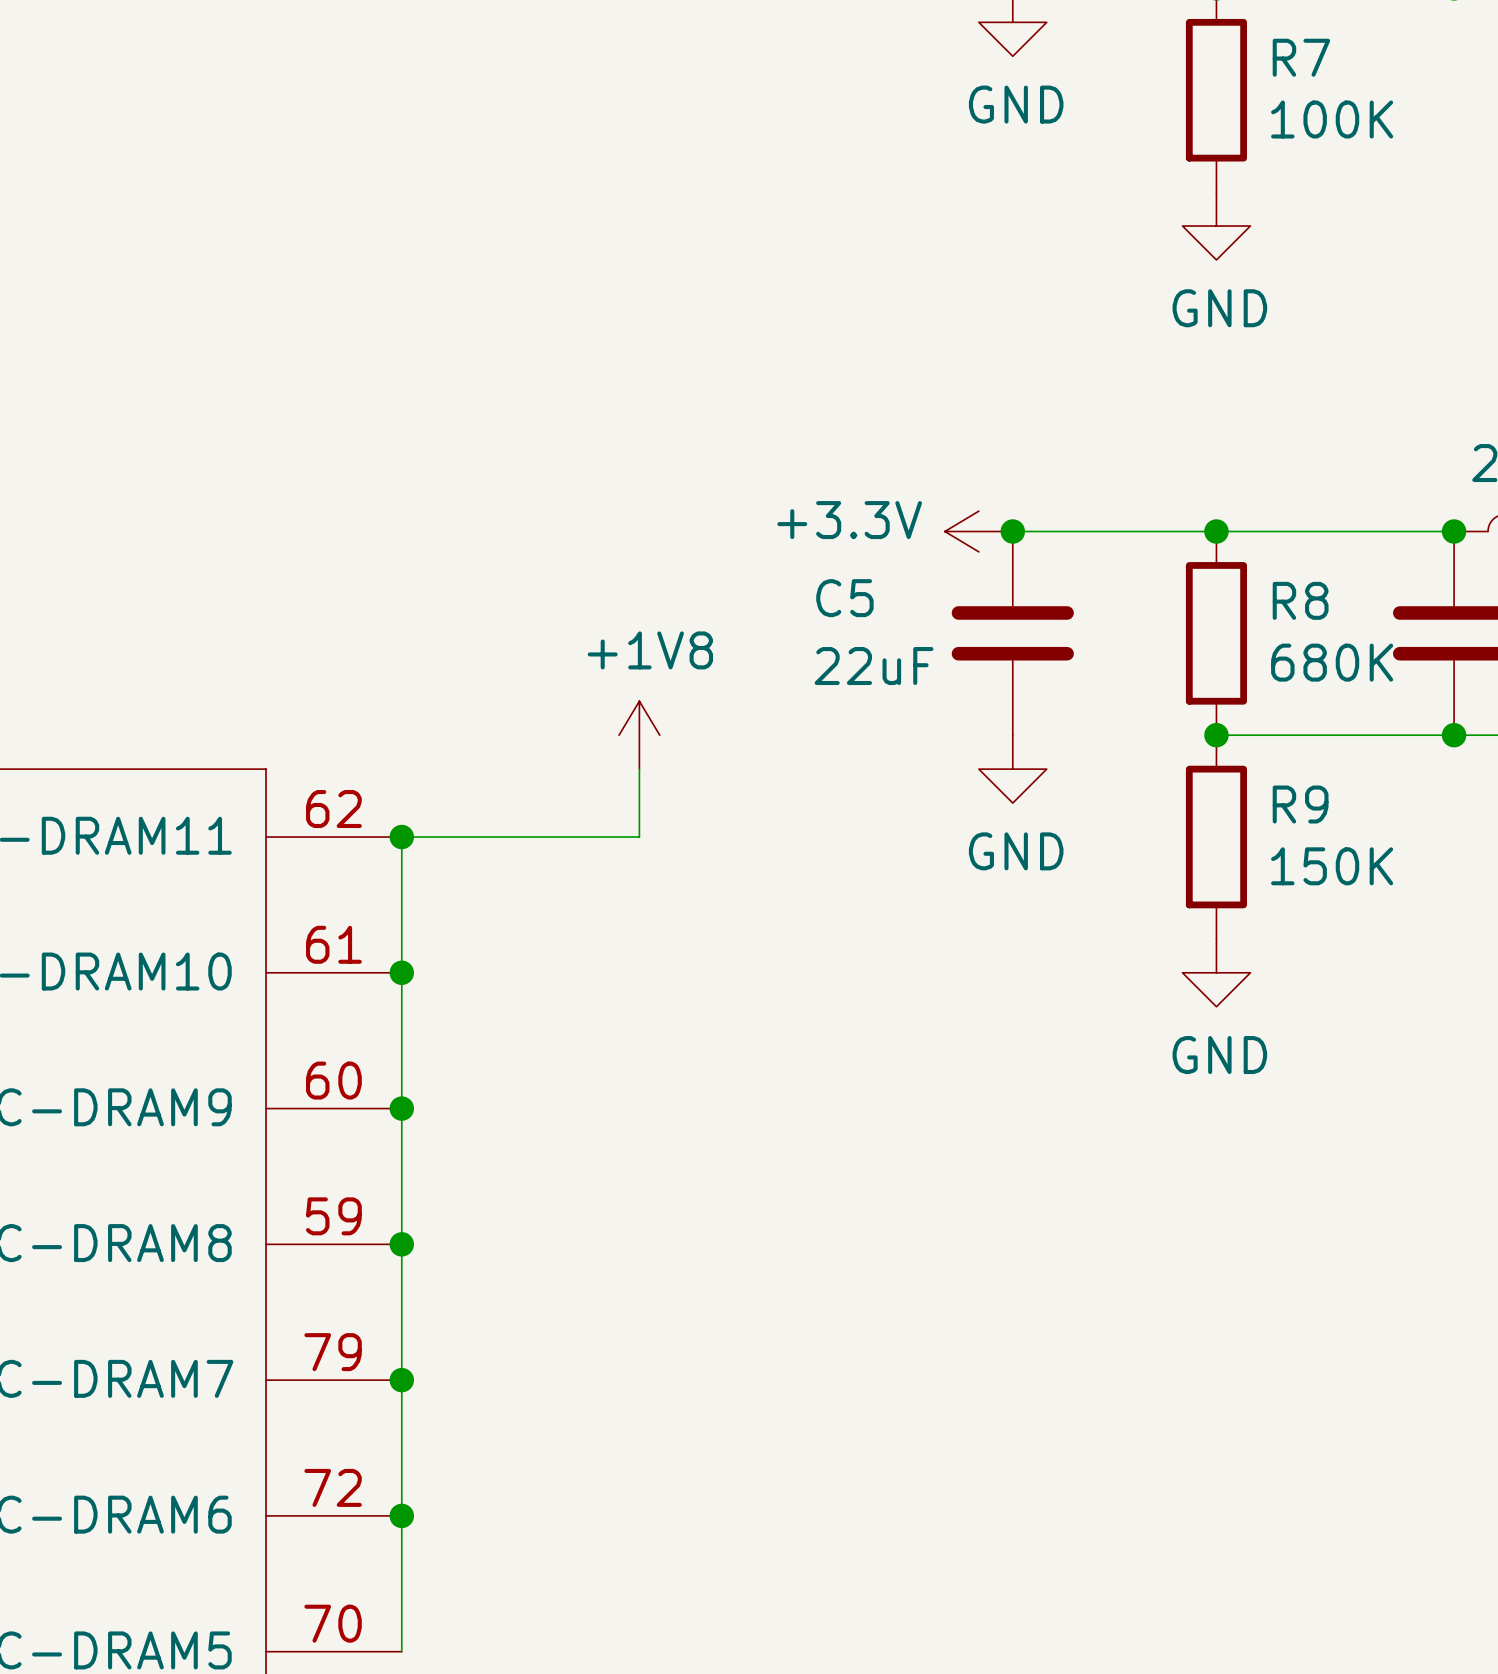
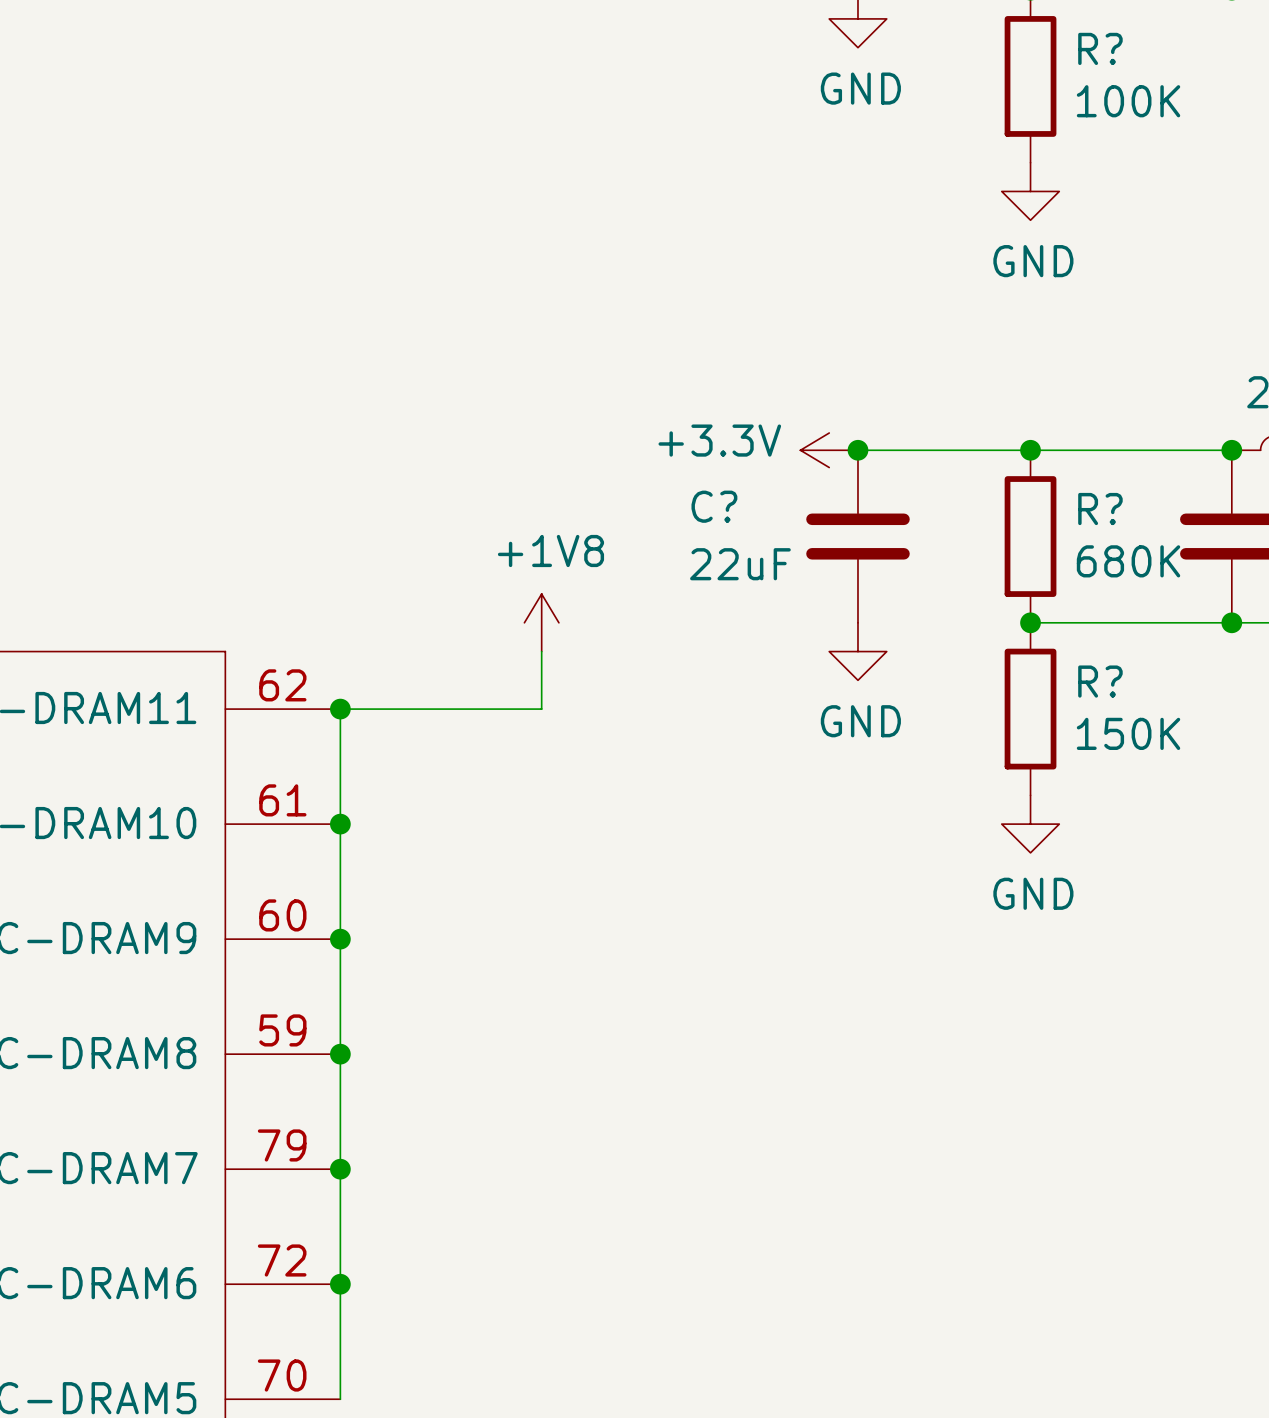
R7 name: R7 (1301, 57) -> R? (1100, 48)
C5 name: C5 (844, 598) -> C? (714, 506)
R8 name: R8 (1300, 600) -> R? (1100, 509)
R9 name: R9 (1300, 804) -> R? (1100, 681)

